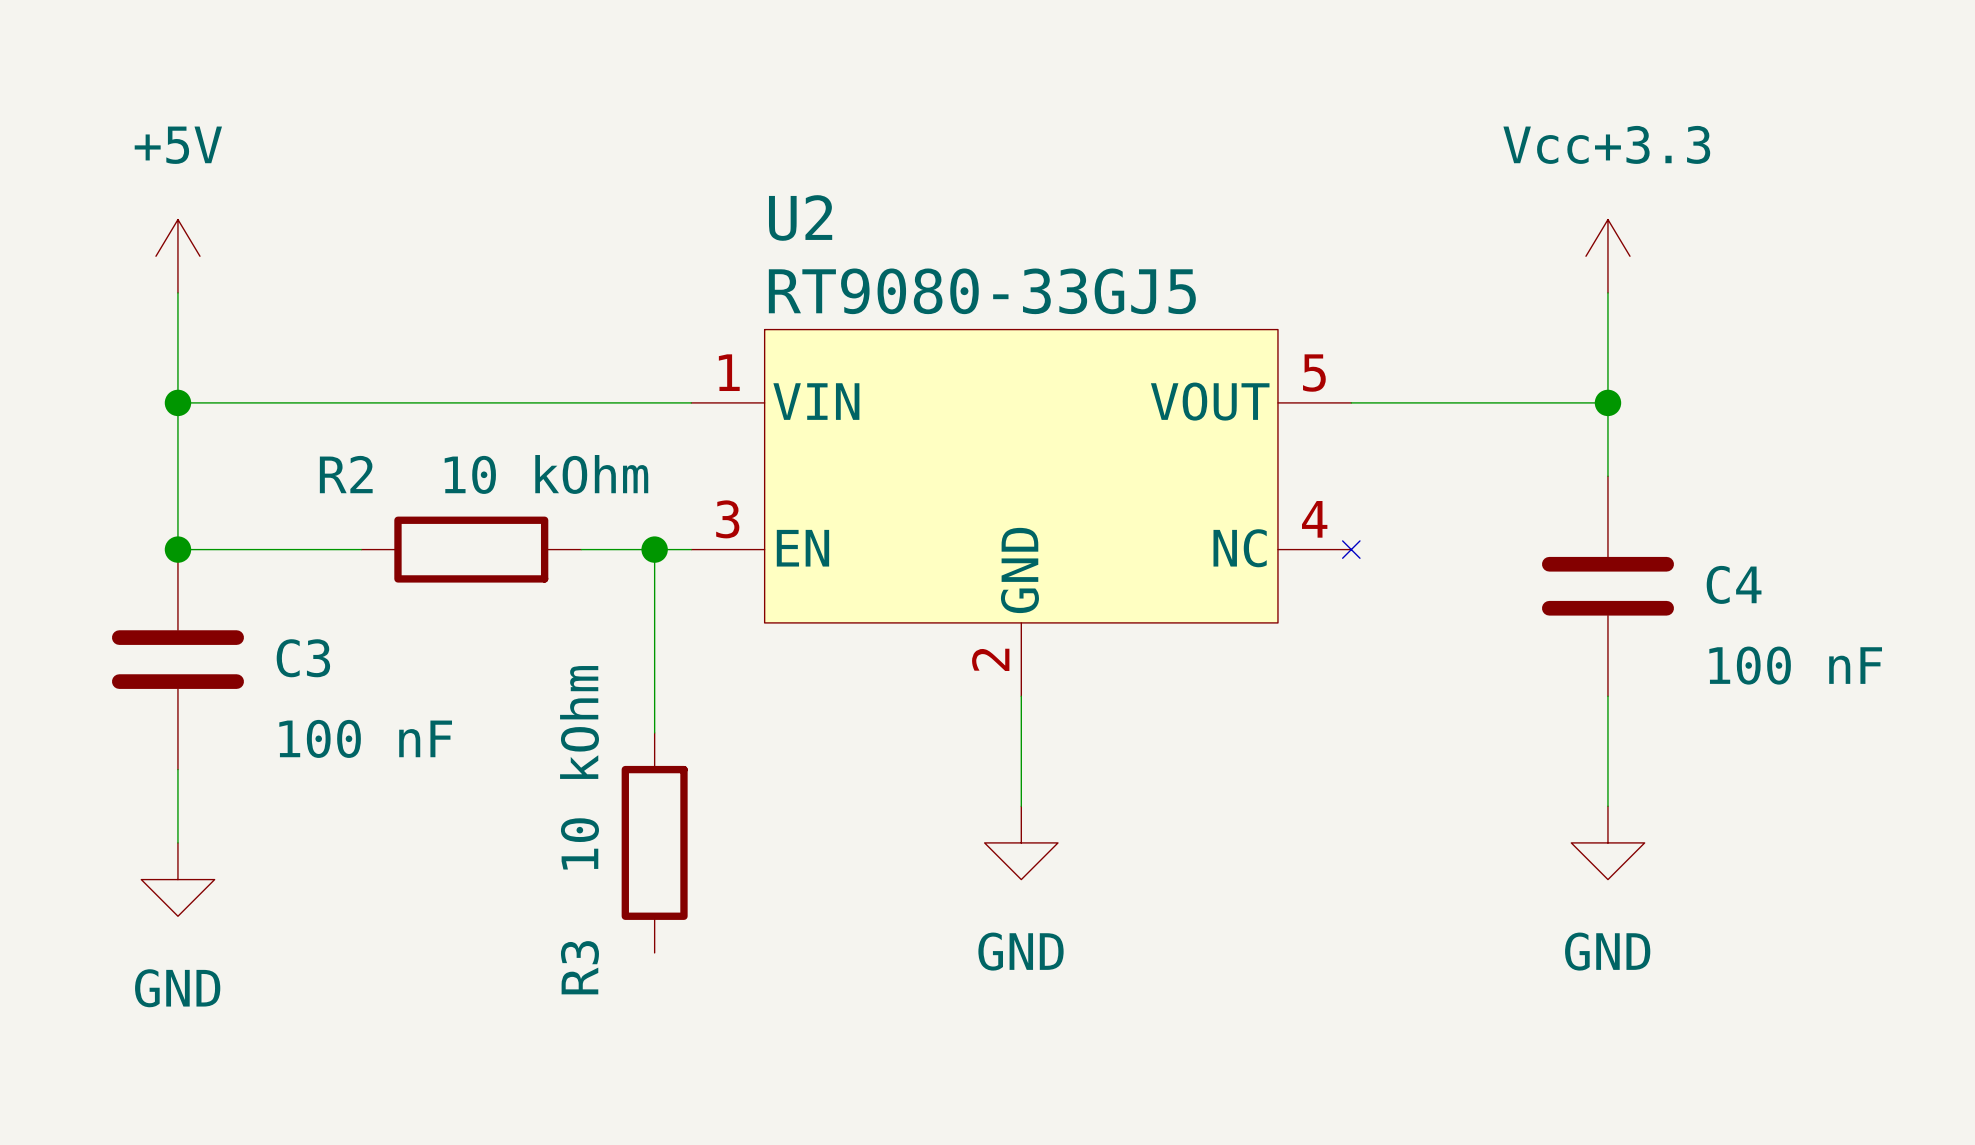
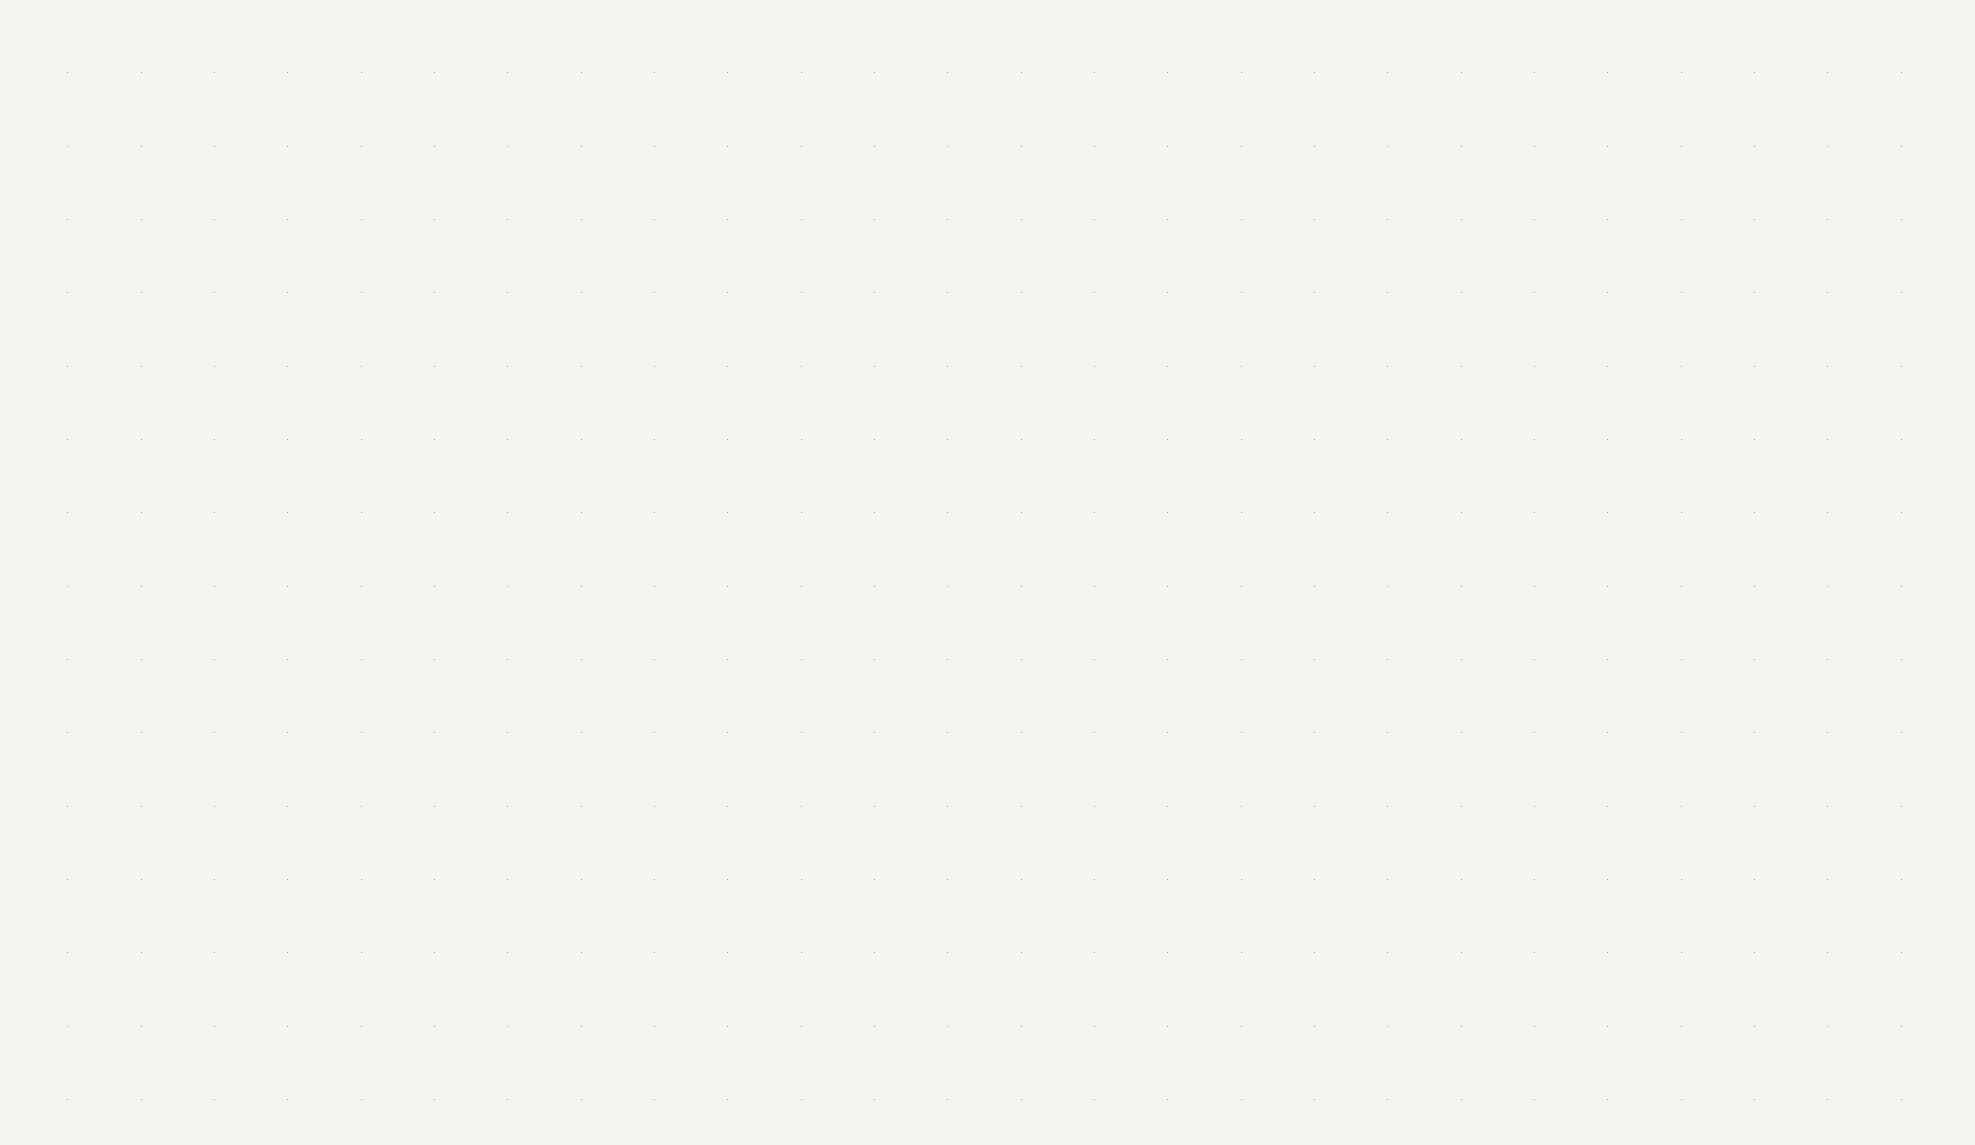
power symbol: +5V (177, 256) -> none
power symbol: Vcc+3.3 (1607, 256) -> none
wire: (177, 292) (177, 549) (361, 549) -> none
wire: (1607, 292) (1607, 476) -> none
wire: (177, 402) (691, 402) -> none
junction: (177, 402) -> none
wire: (1351, 402) (1607, 402) -> none
junction: (1607, 402) -> none
U2: RT9080-33GJ5 (1025, 512) -> none
junction: (177, 549) -> none
R2: 10 kOhm (471, 549) -> none
wire: (581, 549) (691, 549) -> none
wire: (654, 549) (654, 732) -> none
junction: (654, 549) -> none
C4: 100 nF (1607, 586) -> none
C3: 100 nF (177, 659) -> none
wire: (1021, 696) (1021, 806) -> none
wire: (1607, 696) (1607, 806) -> none
wire: (177, 769) (177, 842) -> none
R3: 10 kOhm (654, 842) -> none
power symbol: GND (1021, 842) -> none
power symbol: GND (1607, 842) -> none
power symbol: GND (177, 879) -> none

